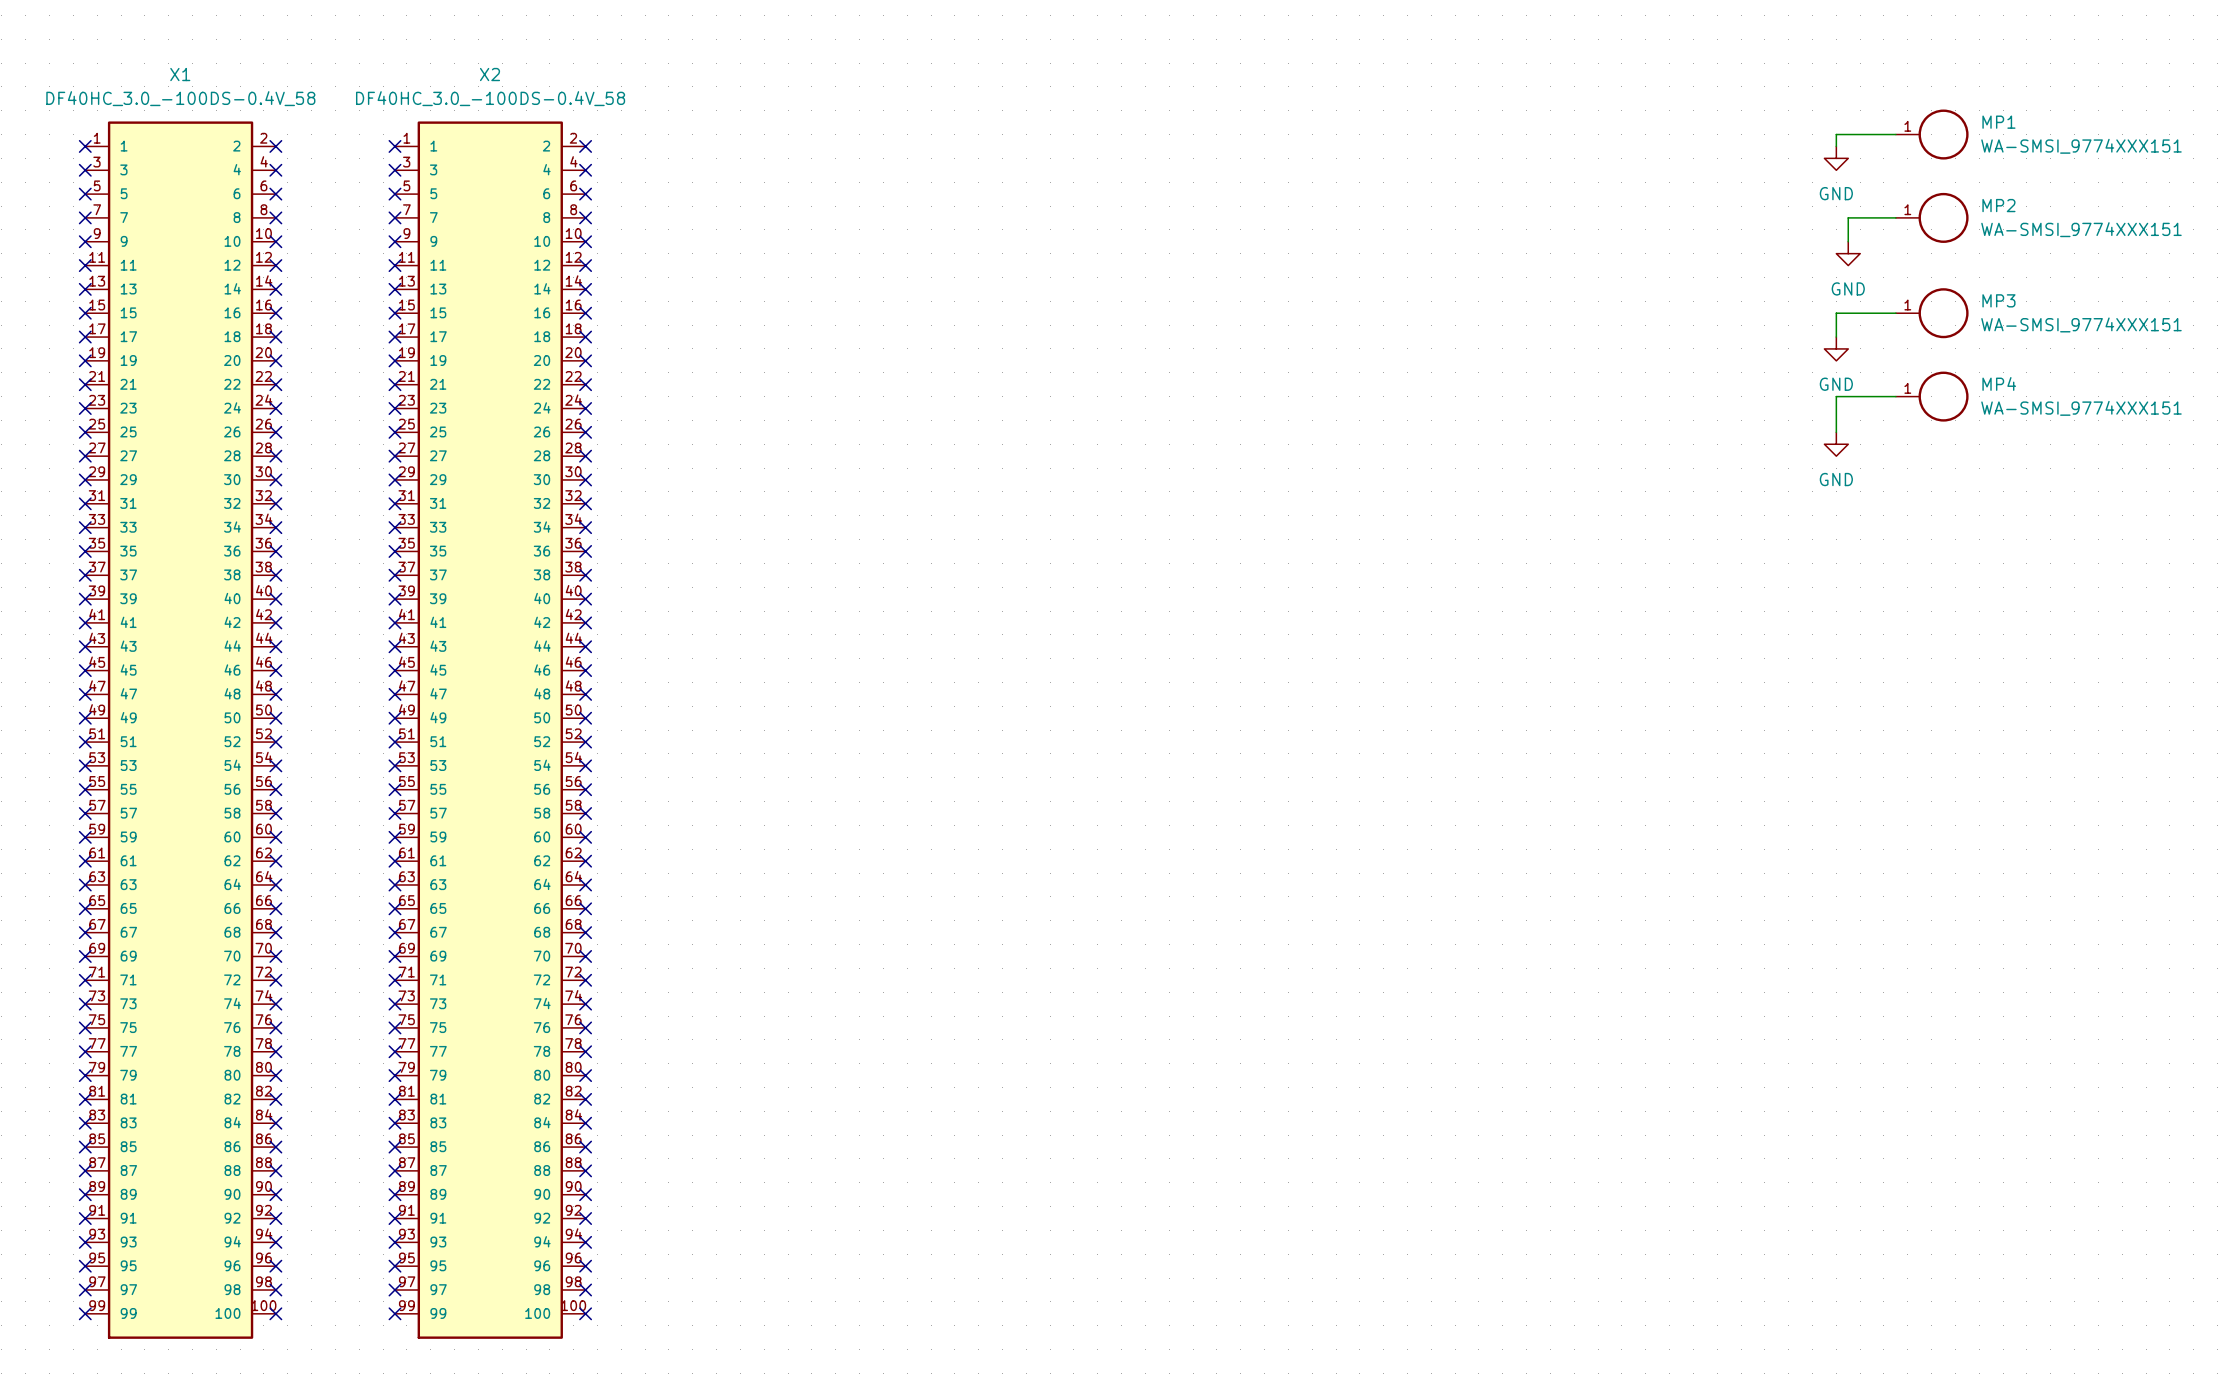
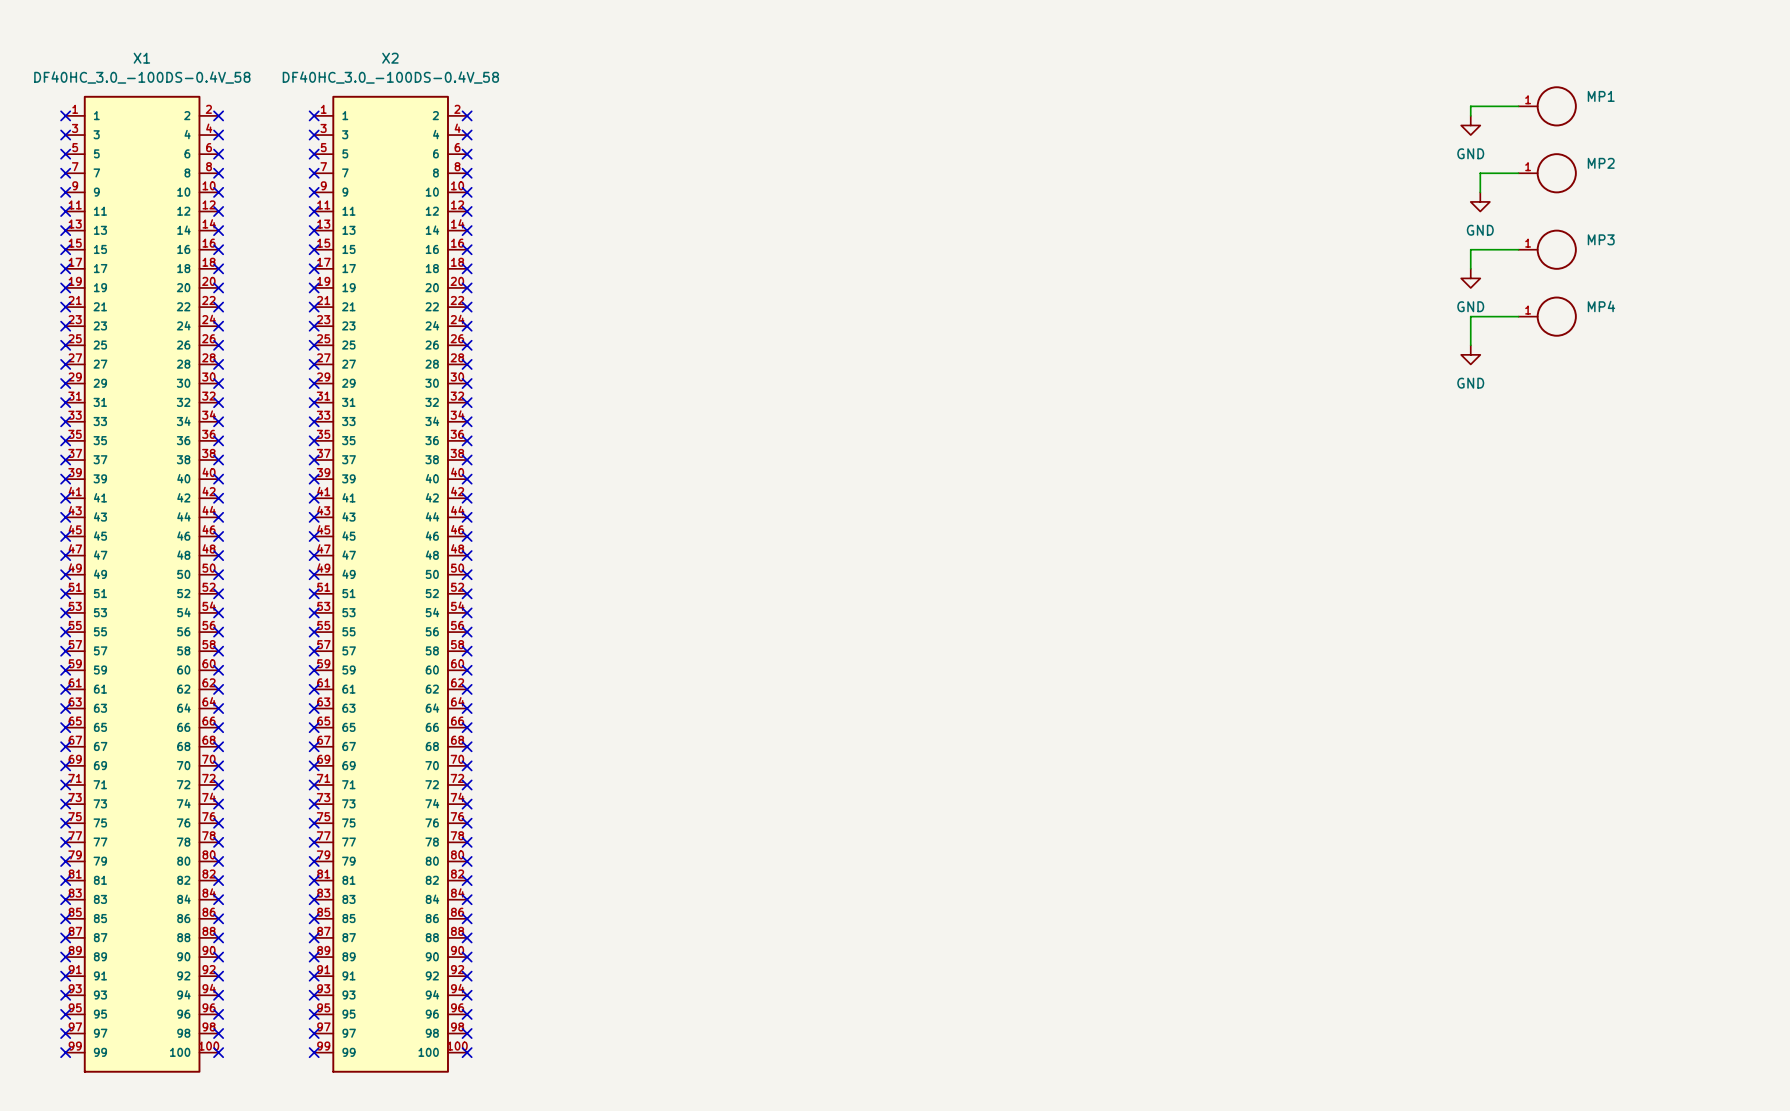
MP1 value: WA-SMSI_9774XXX151 (2081, 146) -> none
MP2 value: WA-SMSI_9774XXX151 (2081, 229) -> none
MP3 value: WA-SMSI_9774XXX151 (2081, 324) -> none
MP4 value: WA-SMSI_9774XXX151 (2081, 408) -> none

